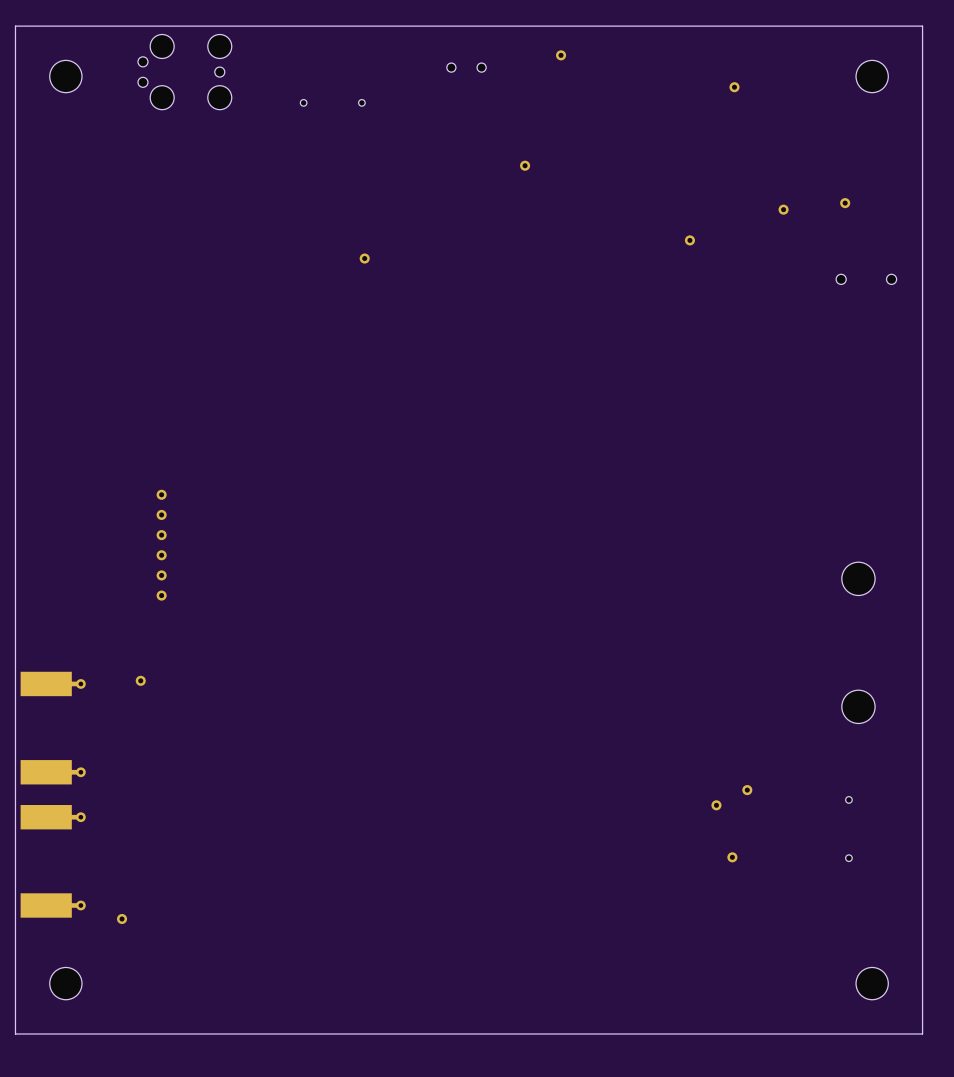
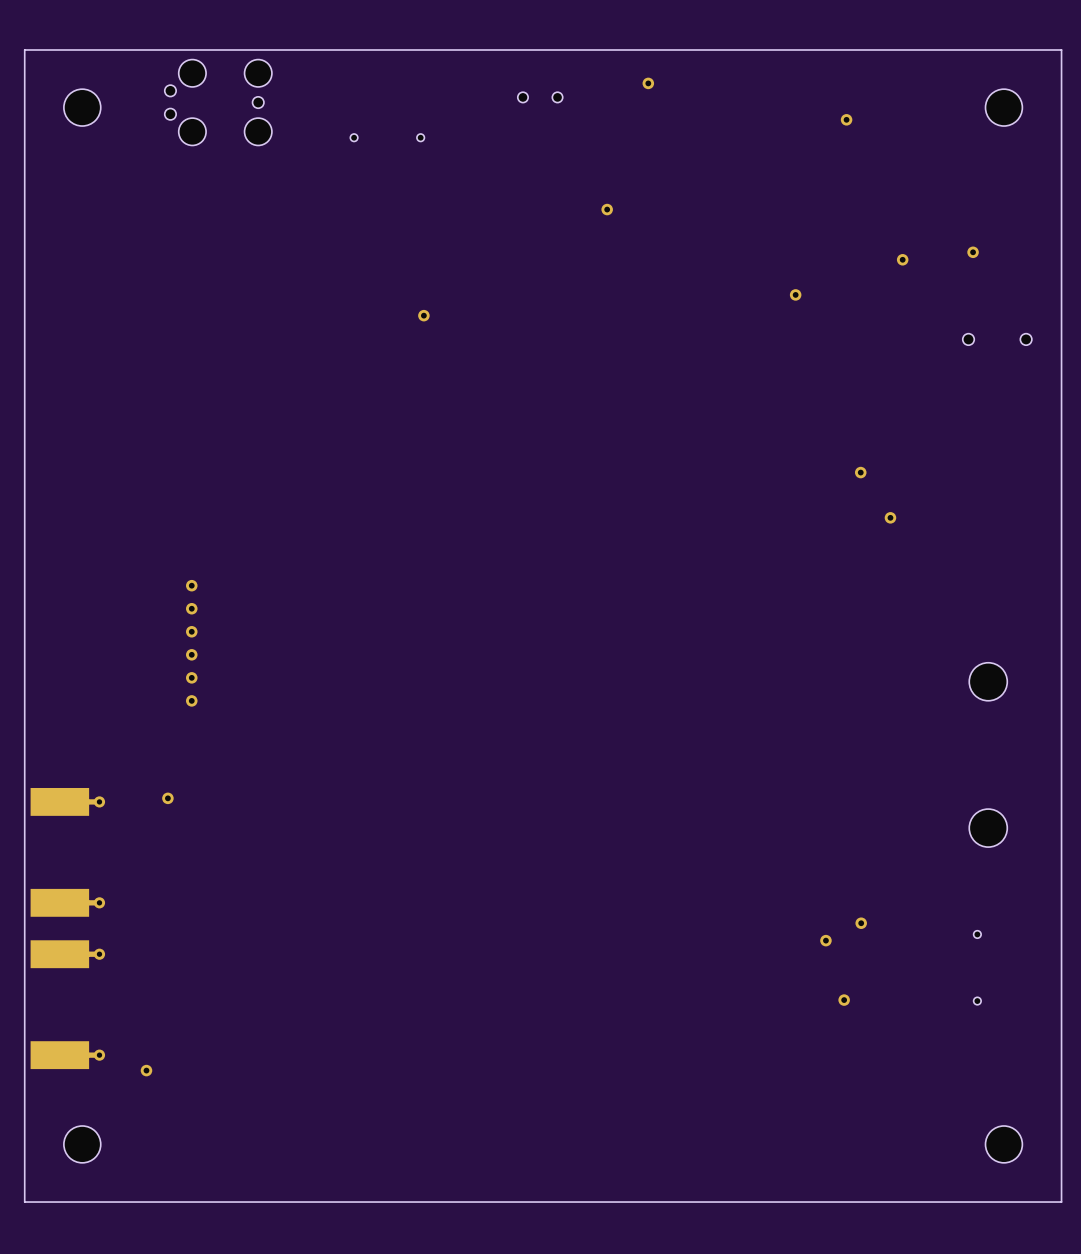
part: none -> (860, 472)
part: none -> (890, 517)

